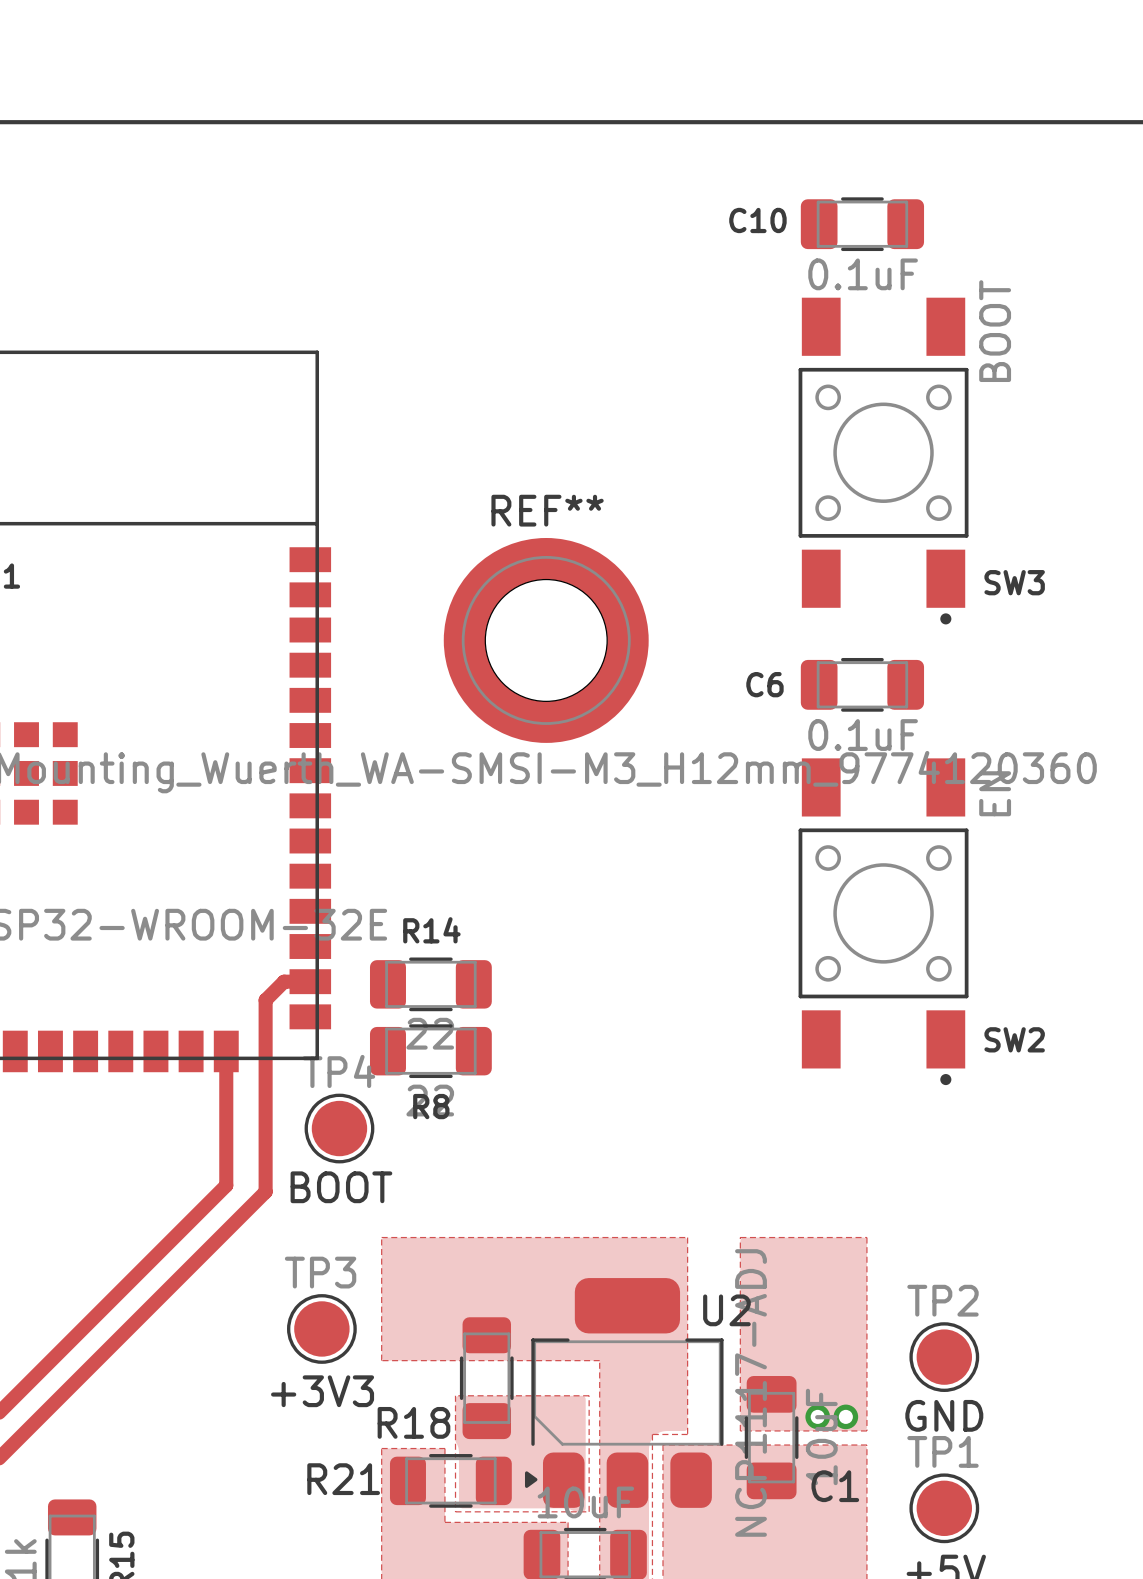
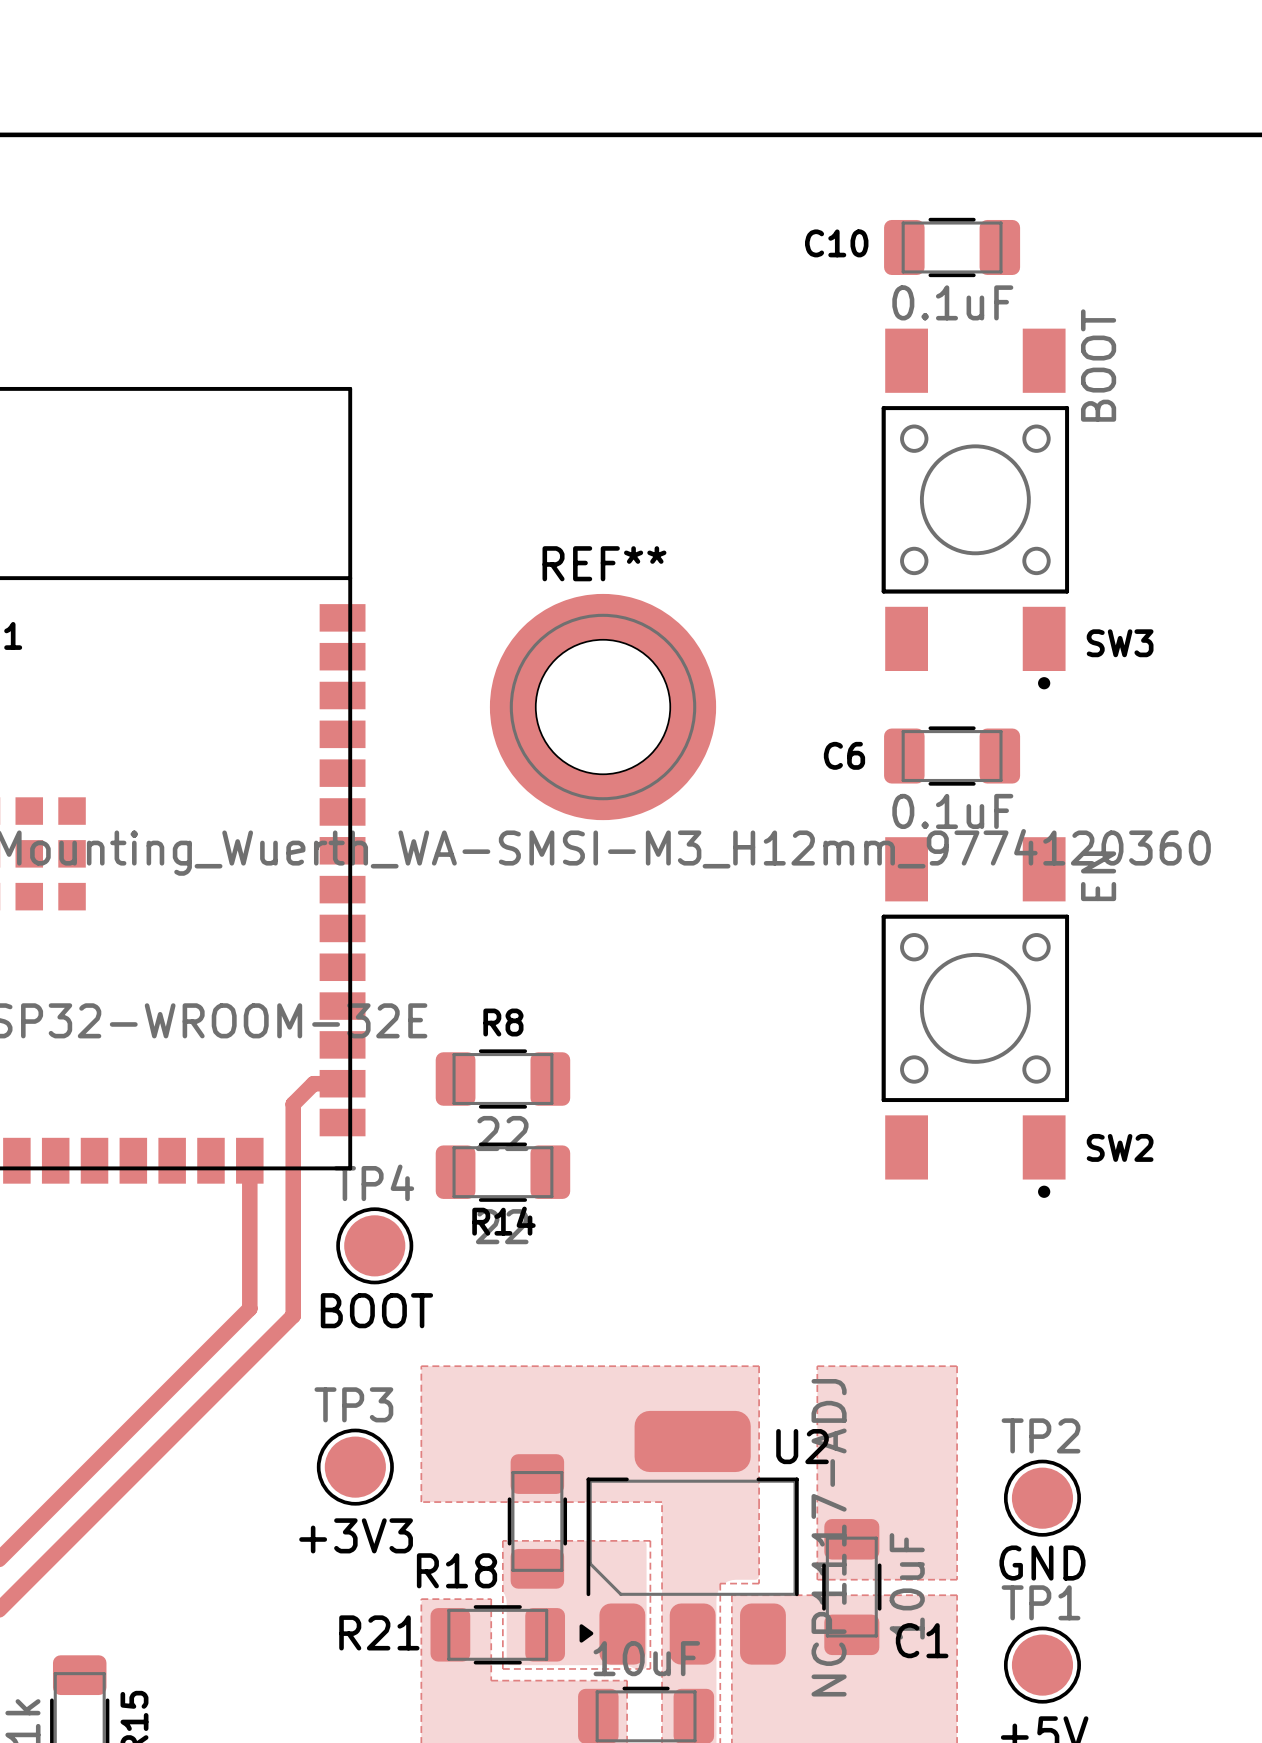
R14 name position: R14 (431, 930) -> R14 (503, 1221)
R14 position: (430, 984) -> (502, 1172)
R8 position: (430, 1051) -> (502, 1079)
R8 name position: R8 (431, 1106) -> R8 (503, 1022)
via: (817, 1416) -> none
via: (845, 1416) -> none

